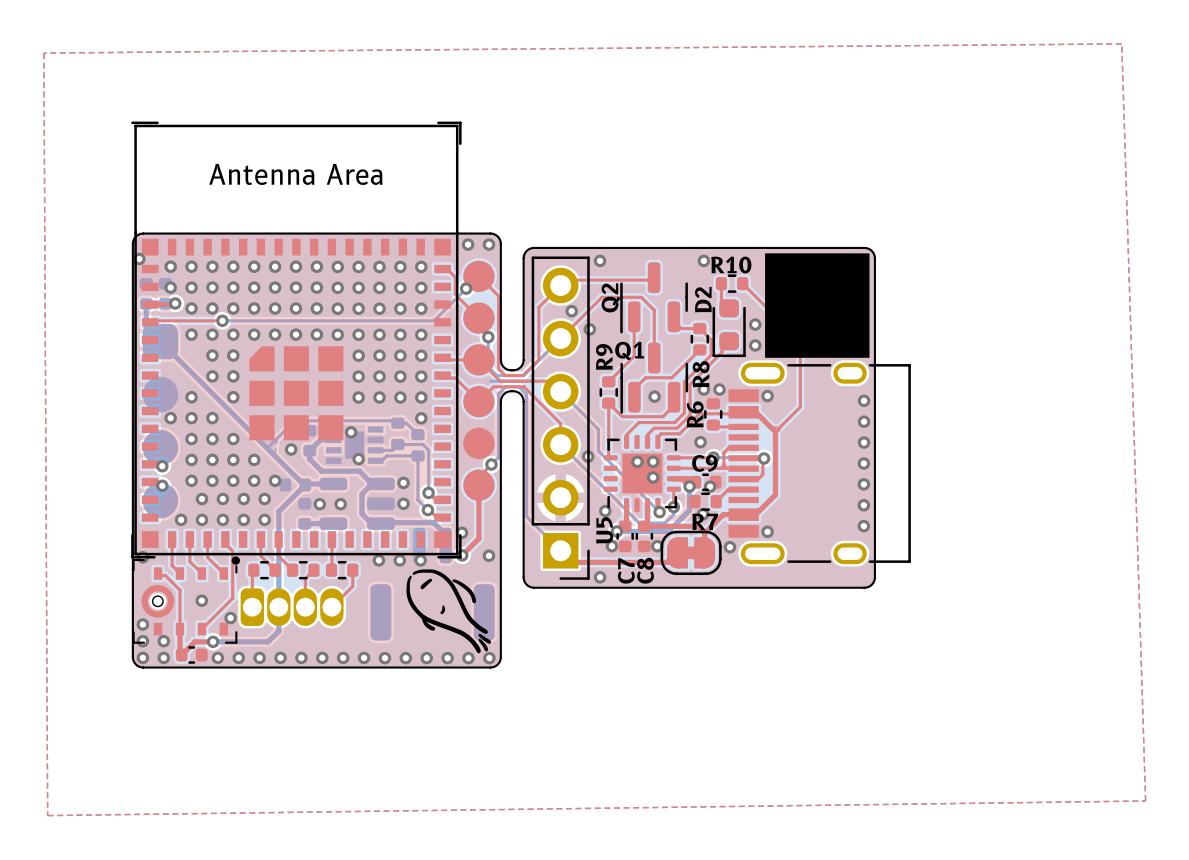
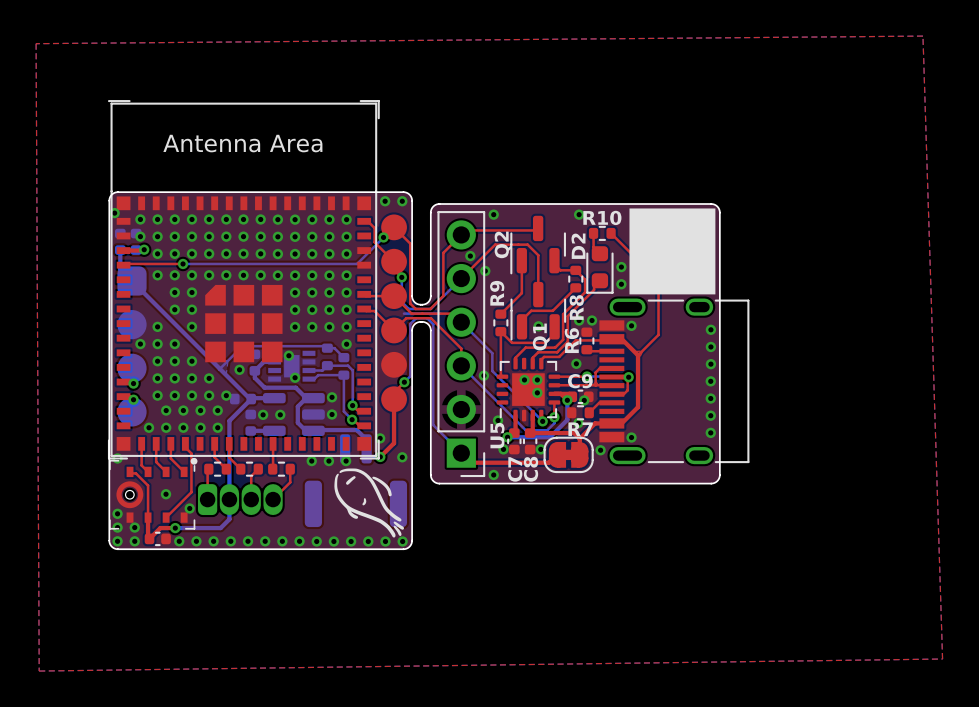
Q1 name rotation: 0° (629, 350) -> 90° counterclockwise (541, 337)
Q1 name position: Q1 (629, 350) -> Q1 (541, 337)

